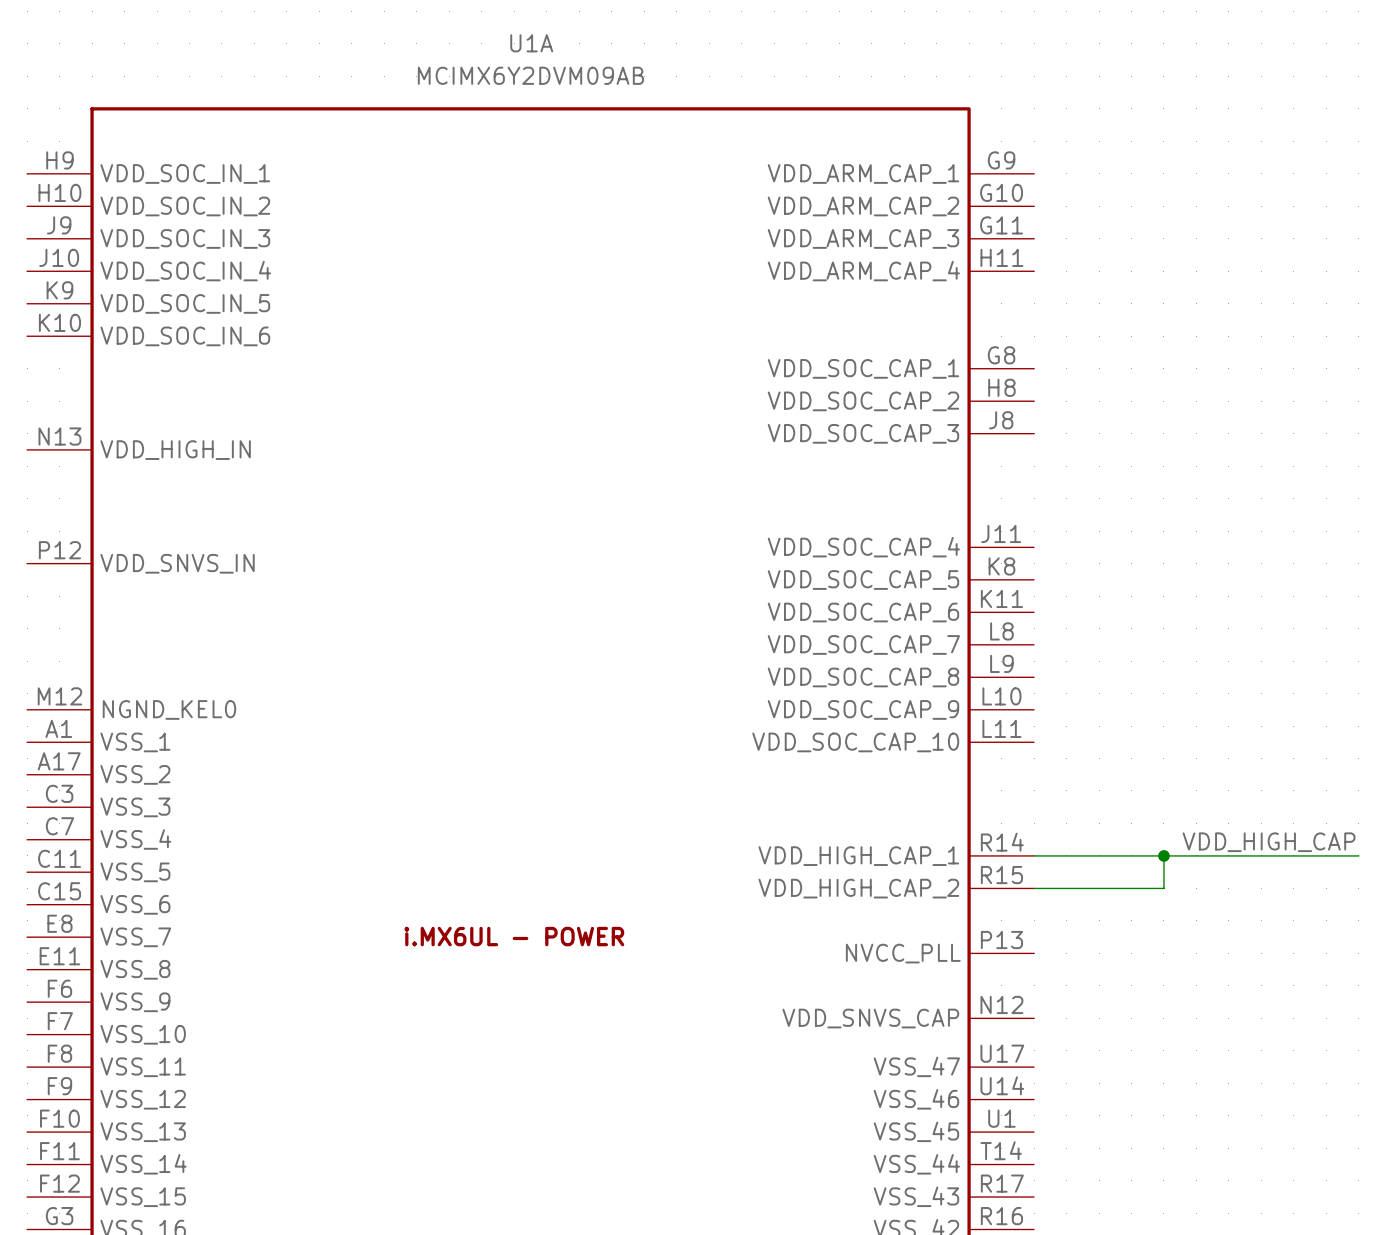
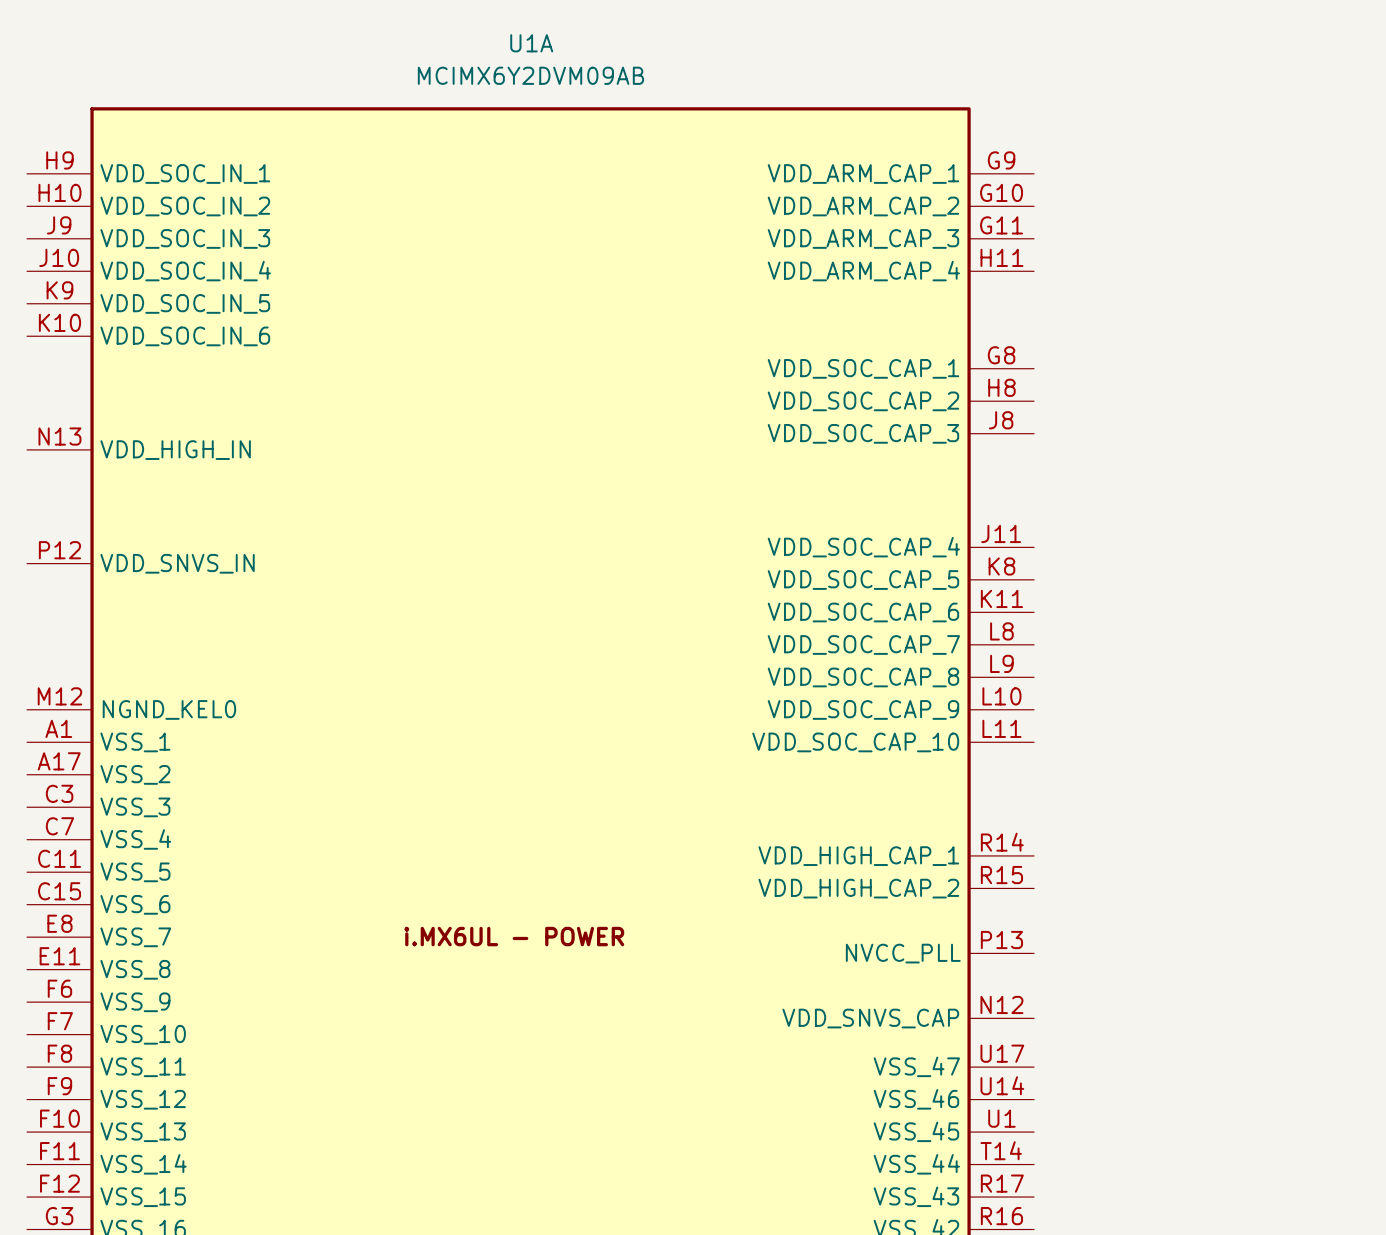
label: VDD_HIGH_CAP (1269, 842) -> none
wire: (1034, 855) (1358, 855) -> none
wire: (1163, 855) (1163, 888) (1034, 888) -> none
junction: (1163, 855) -> none

